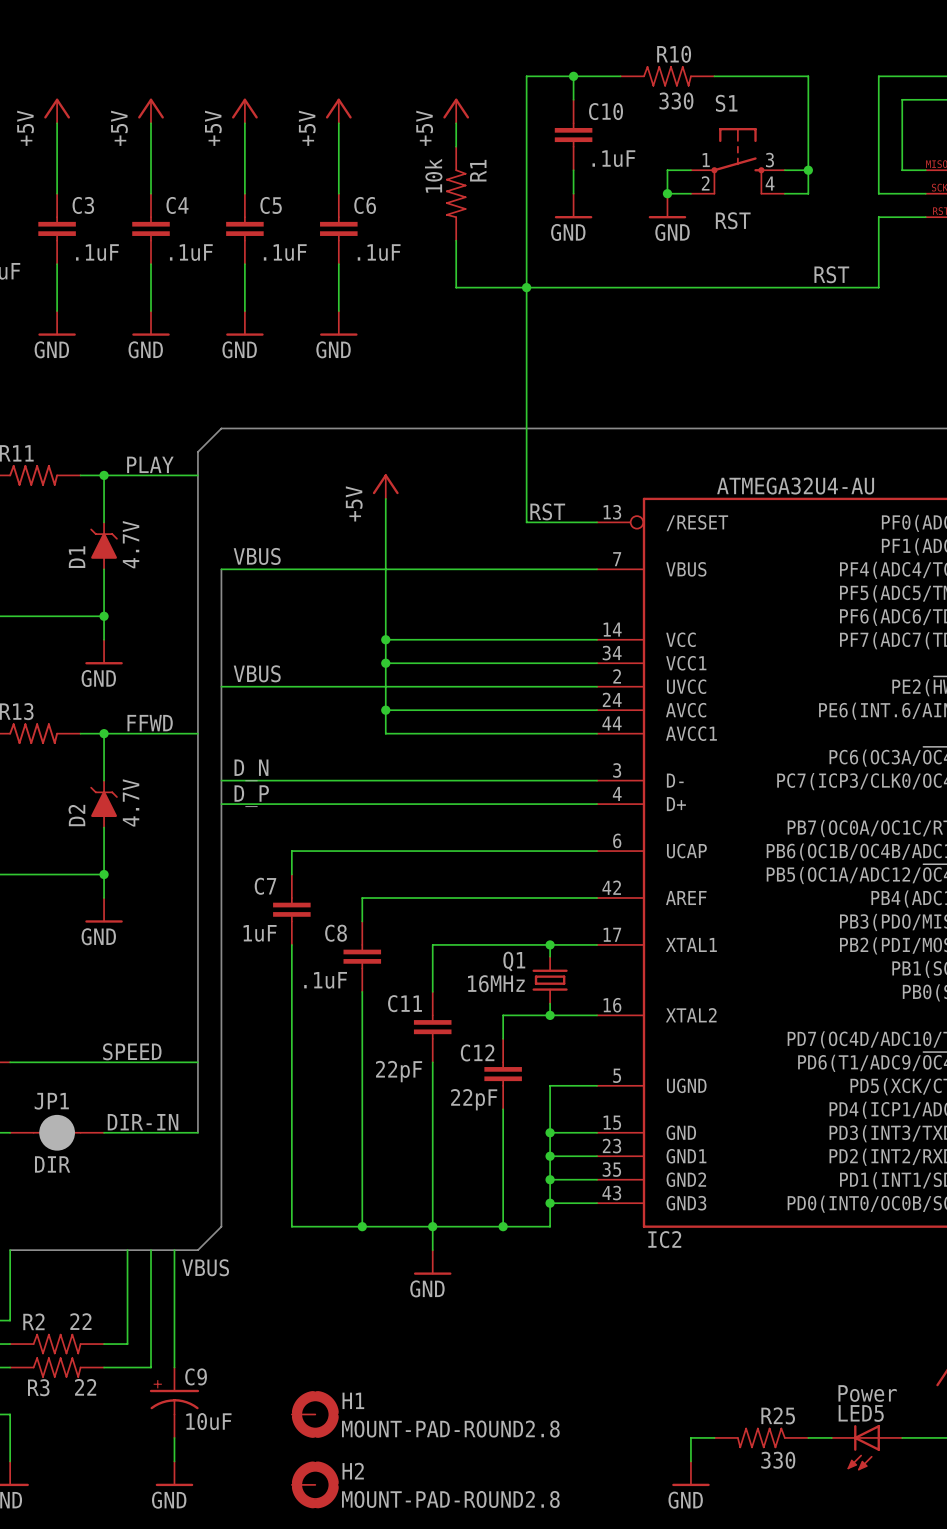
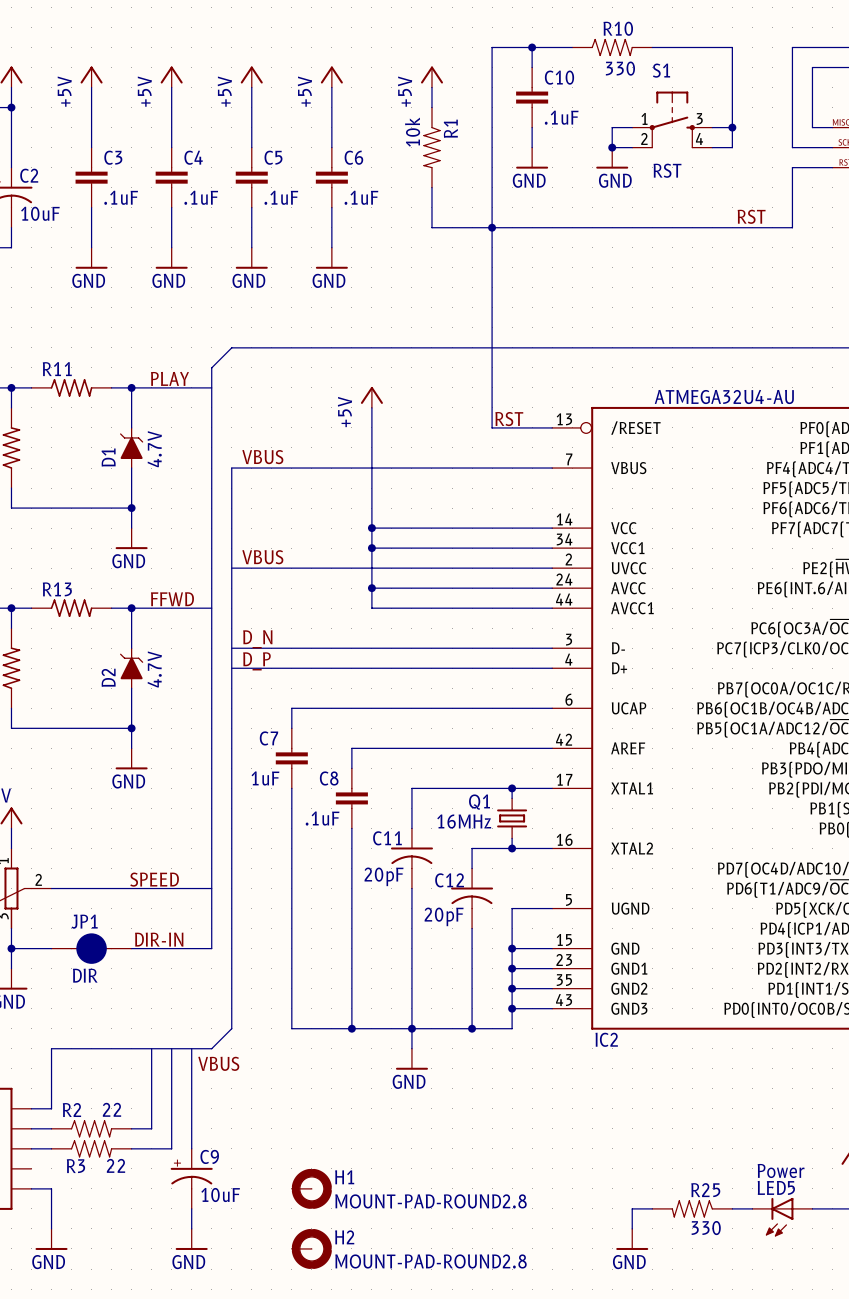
C11 symbol: [413, 991, 452, 1063] -> [390, 828, 433, 889]
C12 symbol: [484, 1038, 522, 1110] -> [451, 868, 494, 929]
C11 value: 22pF (399, 1071) -> 20pF (384, 876)
C12 value: 22pF (474, 1099) -> 20pF (444, 916)

